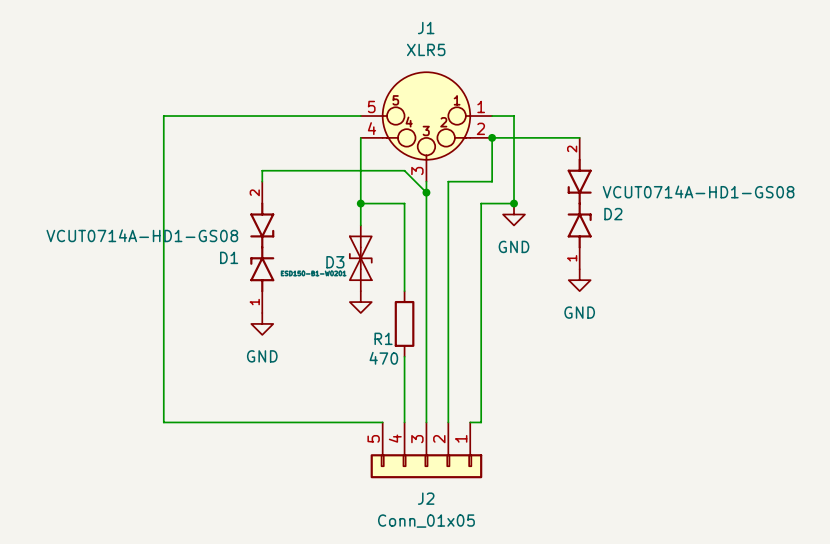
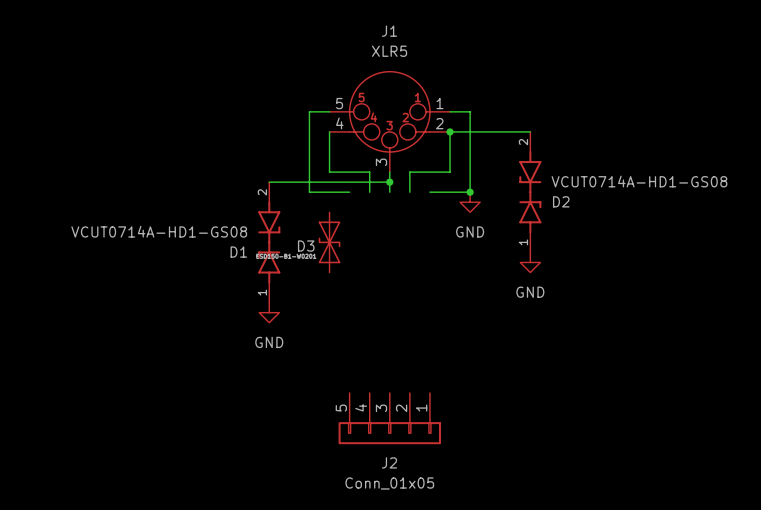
wire: (338, 116) (163, 116) (163, 422) (382, 422) -> (309, 111) (309, 192) (329, 192)
wire: (262, 181) (262, 170) (404, 170) (426, 192) -> (269, 182) (389, 182)
wire: (360, 181) (360, 225) -> (329, 172) (369, 172) (369, 192)
junction: (360, 203) -> none
wire: (382, 203) (404, 203) (404, 291) -> none
wire: (426, 203) (426, 422) -> none
wire: (448, 203) (448, 422) -> none
wire: (481, 203) (481, 422) (470, 422) -> (439, 192) (429, 192)
D1 position: (262, 247) -> (269, 242)
power symbol: (360, 302) -> none
power symbol position: GND (262, 323) -> GND (269, 312)
R1: 470 (404, 323) -> none
wire: (404, 356) (404, 422) -> none

